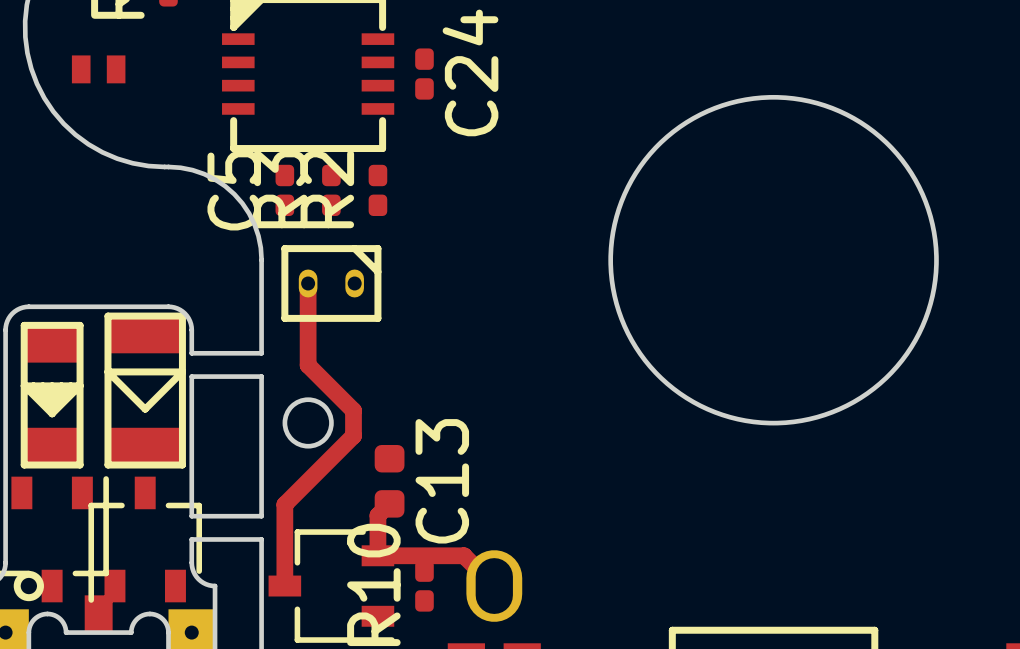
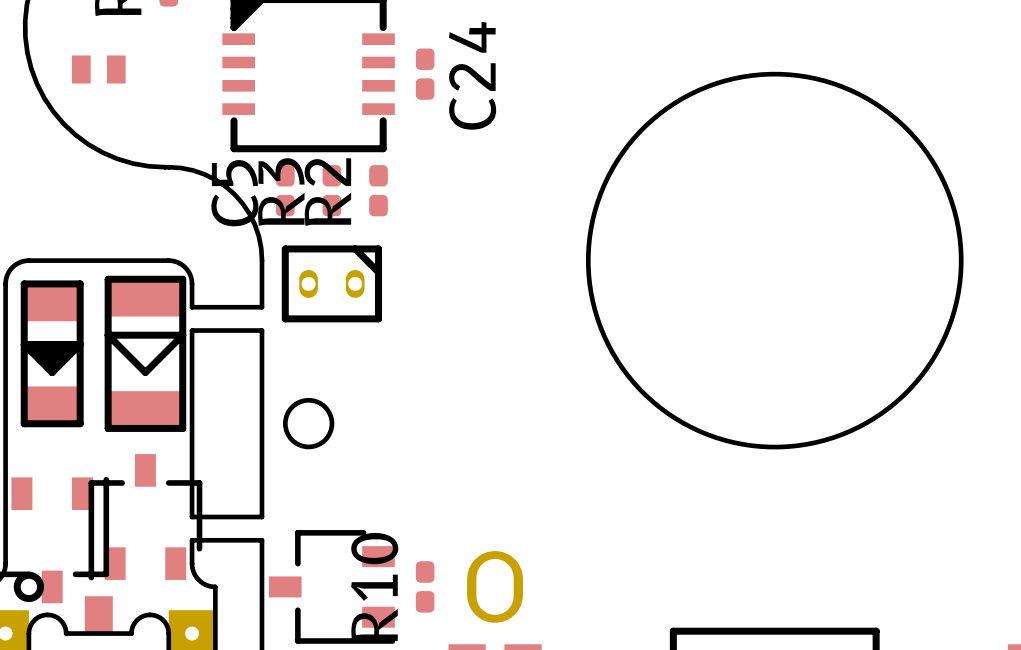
round board edge size: [608, 94, 939, 426] -> [585, 71, 964, 450]
track: (308, 283) (308, 365) (353, 410) (353, 435) (284, 504) (284, 586) -> none
board edge: (261, 306) (261, 330) -> (192, 330) (261, 330)
board edge: (5, 330) (7, 321) (12, 313) (19, 308) (28, 306) (171, 306) (184, 313) (189, 321) (191, 330) -> (5, 330) (6, 277) (14, 265) (25, 260) (171, 260) (182, 265) (190, 275) (192, 307) (261, 307)
board edge: (191, 353) (261, 353) -> (192, 353) (192, 377)
board edge: (191, 376) (261, 376) -> (261, 353) (261, 377)
part position: (145, 390) -> (145, 353)
part position: (52, 395) -> (52, 353)
C13: (389, 481) -> none
track: (389, 503) (377, 515) (377, 555) (464, 555) (494, 586) -> none
part position: (145, 539) -> (145, 517)

